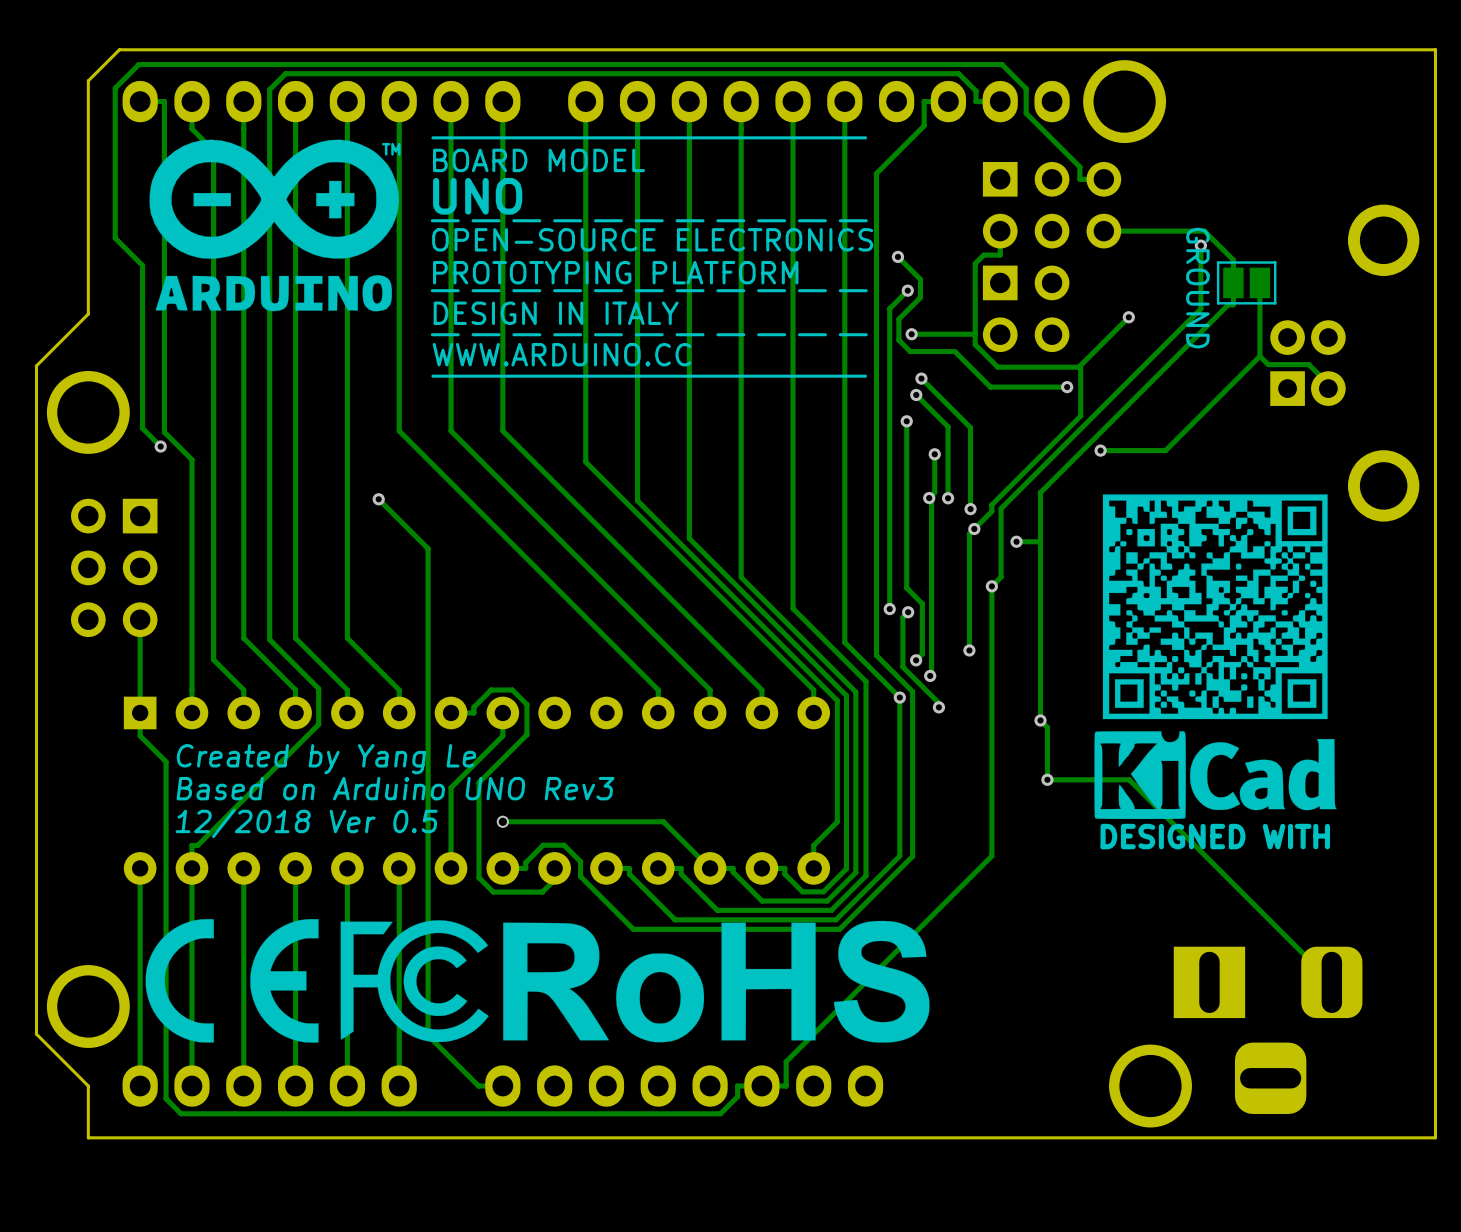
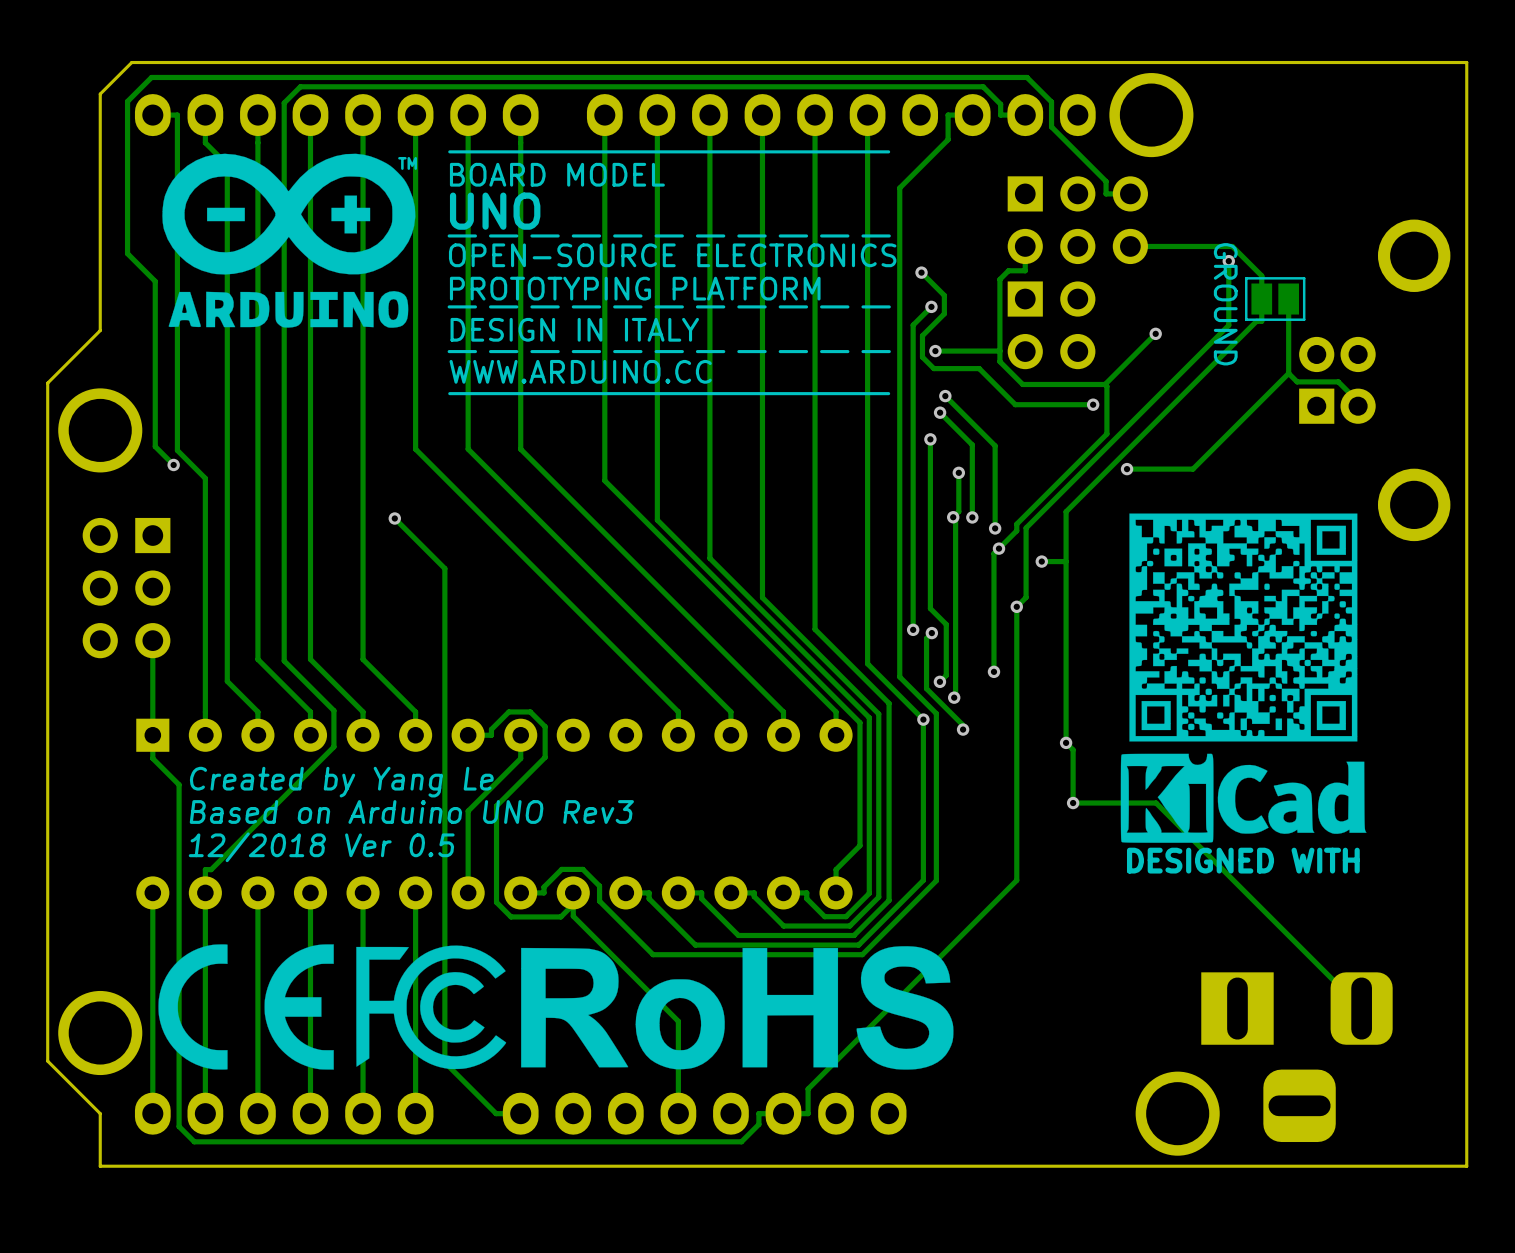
track: (502, 821) (663, 821) (710, 868) -> none
via: (502, 821) -> none
track: none -> (573, 904) (573, 916) (678, 1021) (678, 1113)

